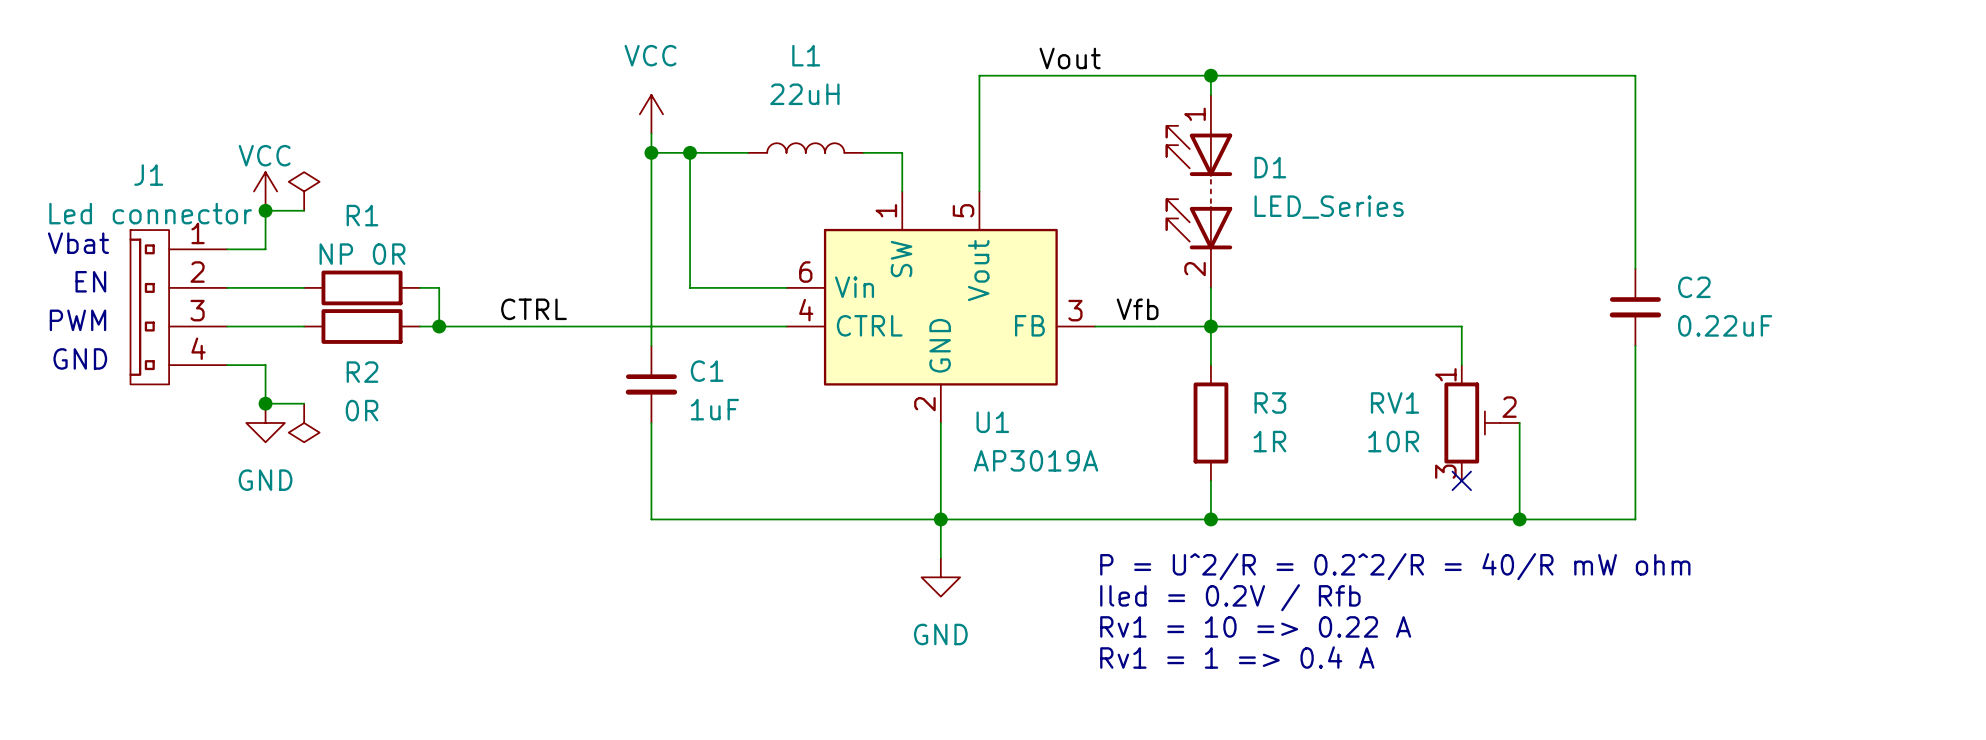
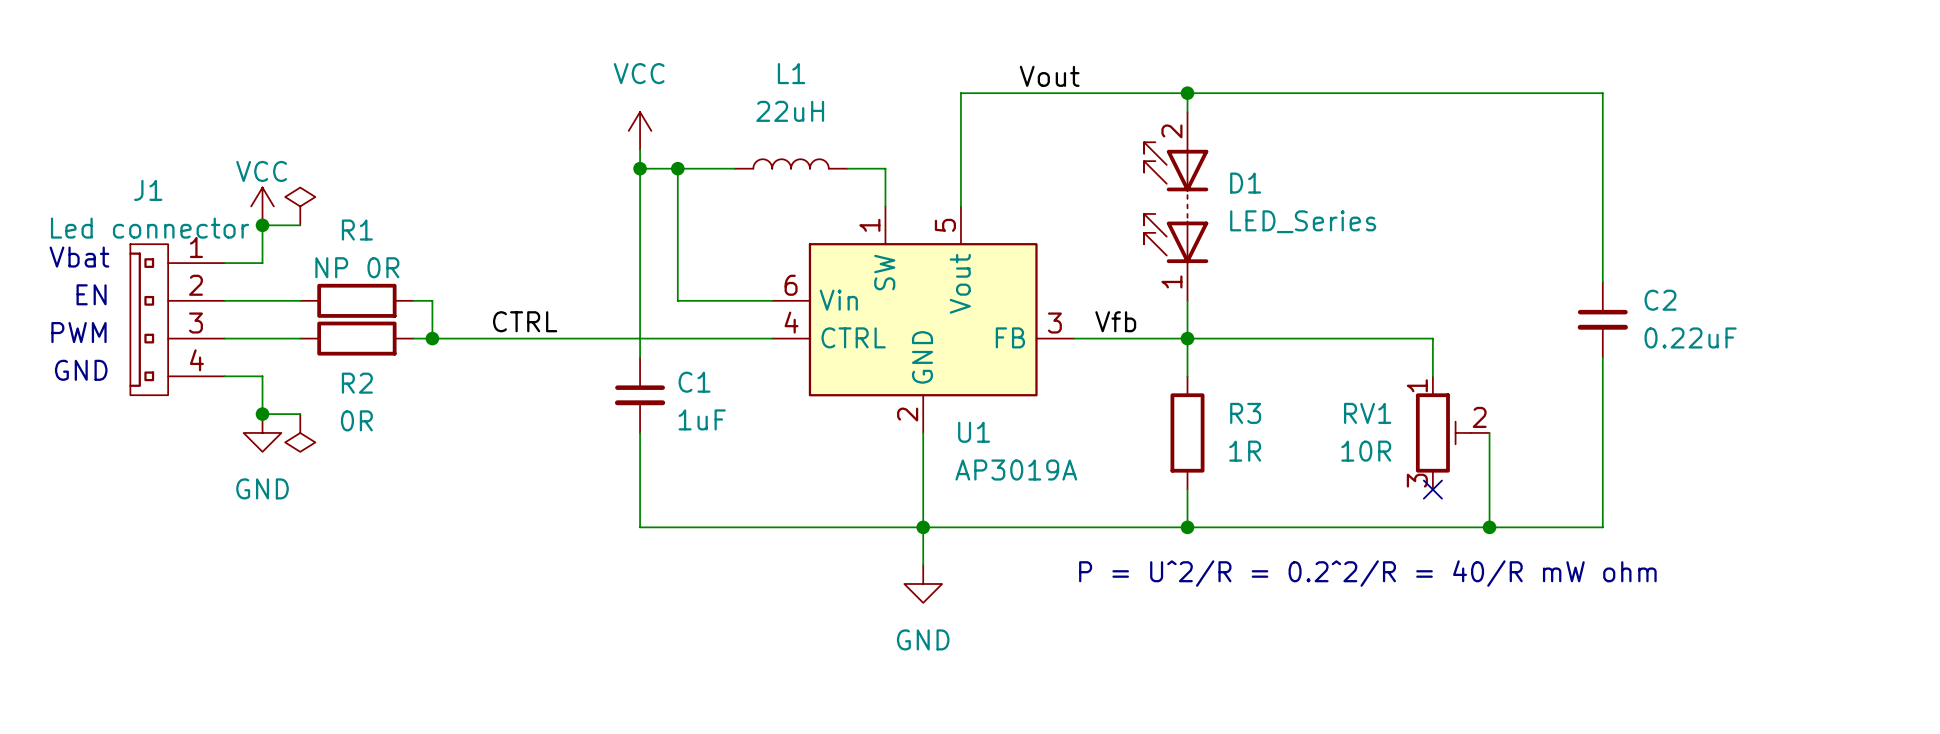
D1 pin number: 1 (1195, 114) -> 2 (1171, 131)
D1 pin number: 2 (1195, 269) -> 1 (1171, 281)
text: Iled = 0.2V / Rfb (1230, 597) -> none
text: Rv1 = 10 => 0.22 A (1255, 626) -> none
text: Rv1 = 1 => 0.4 A (1237, 657) -> none

